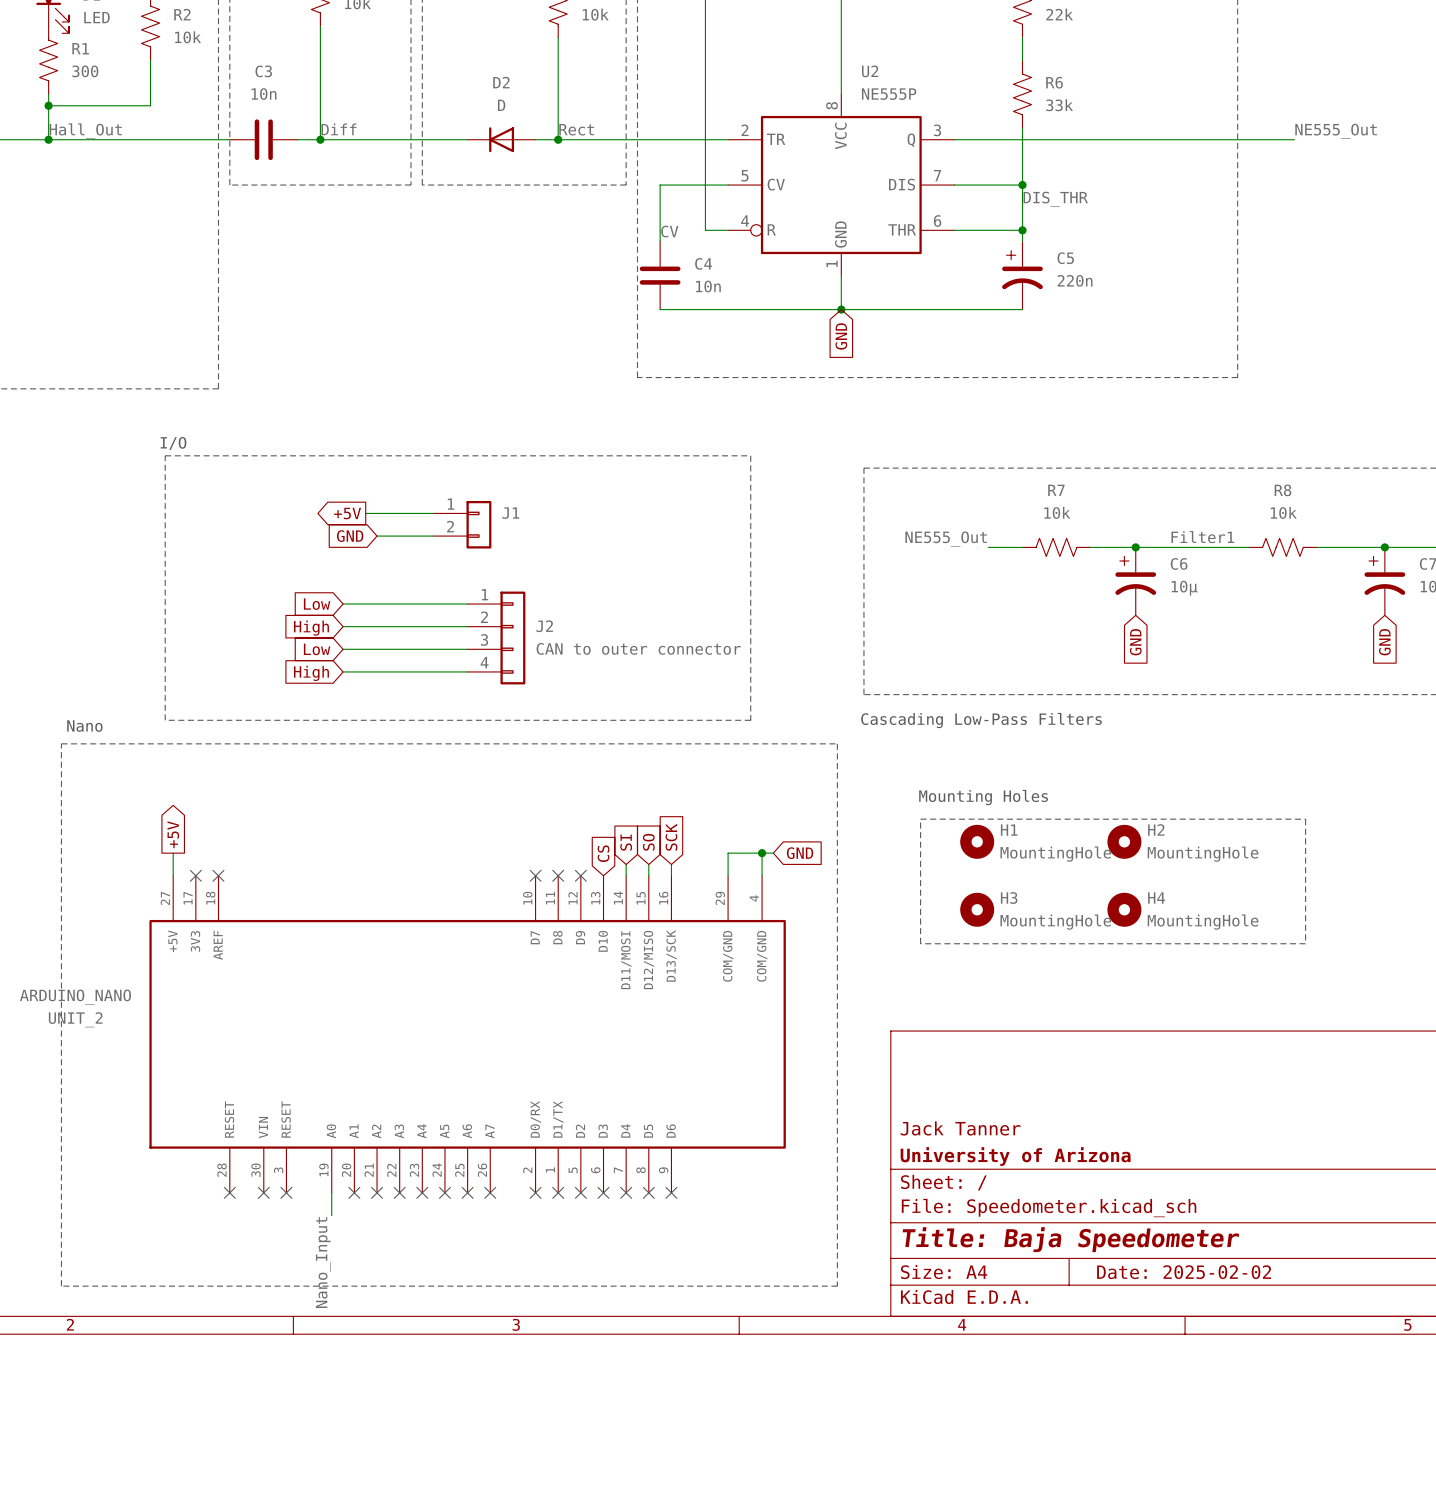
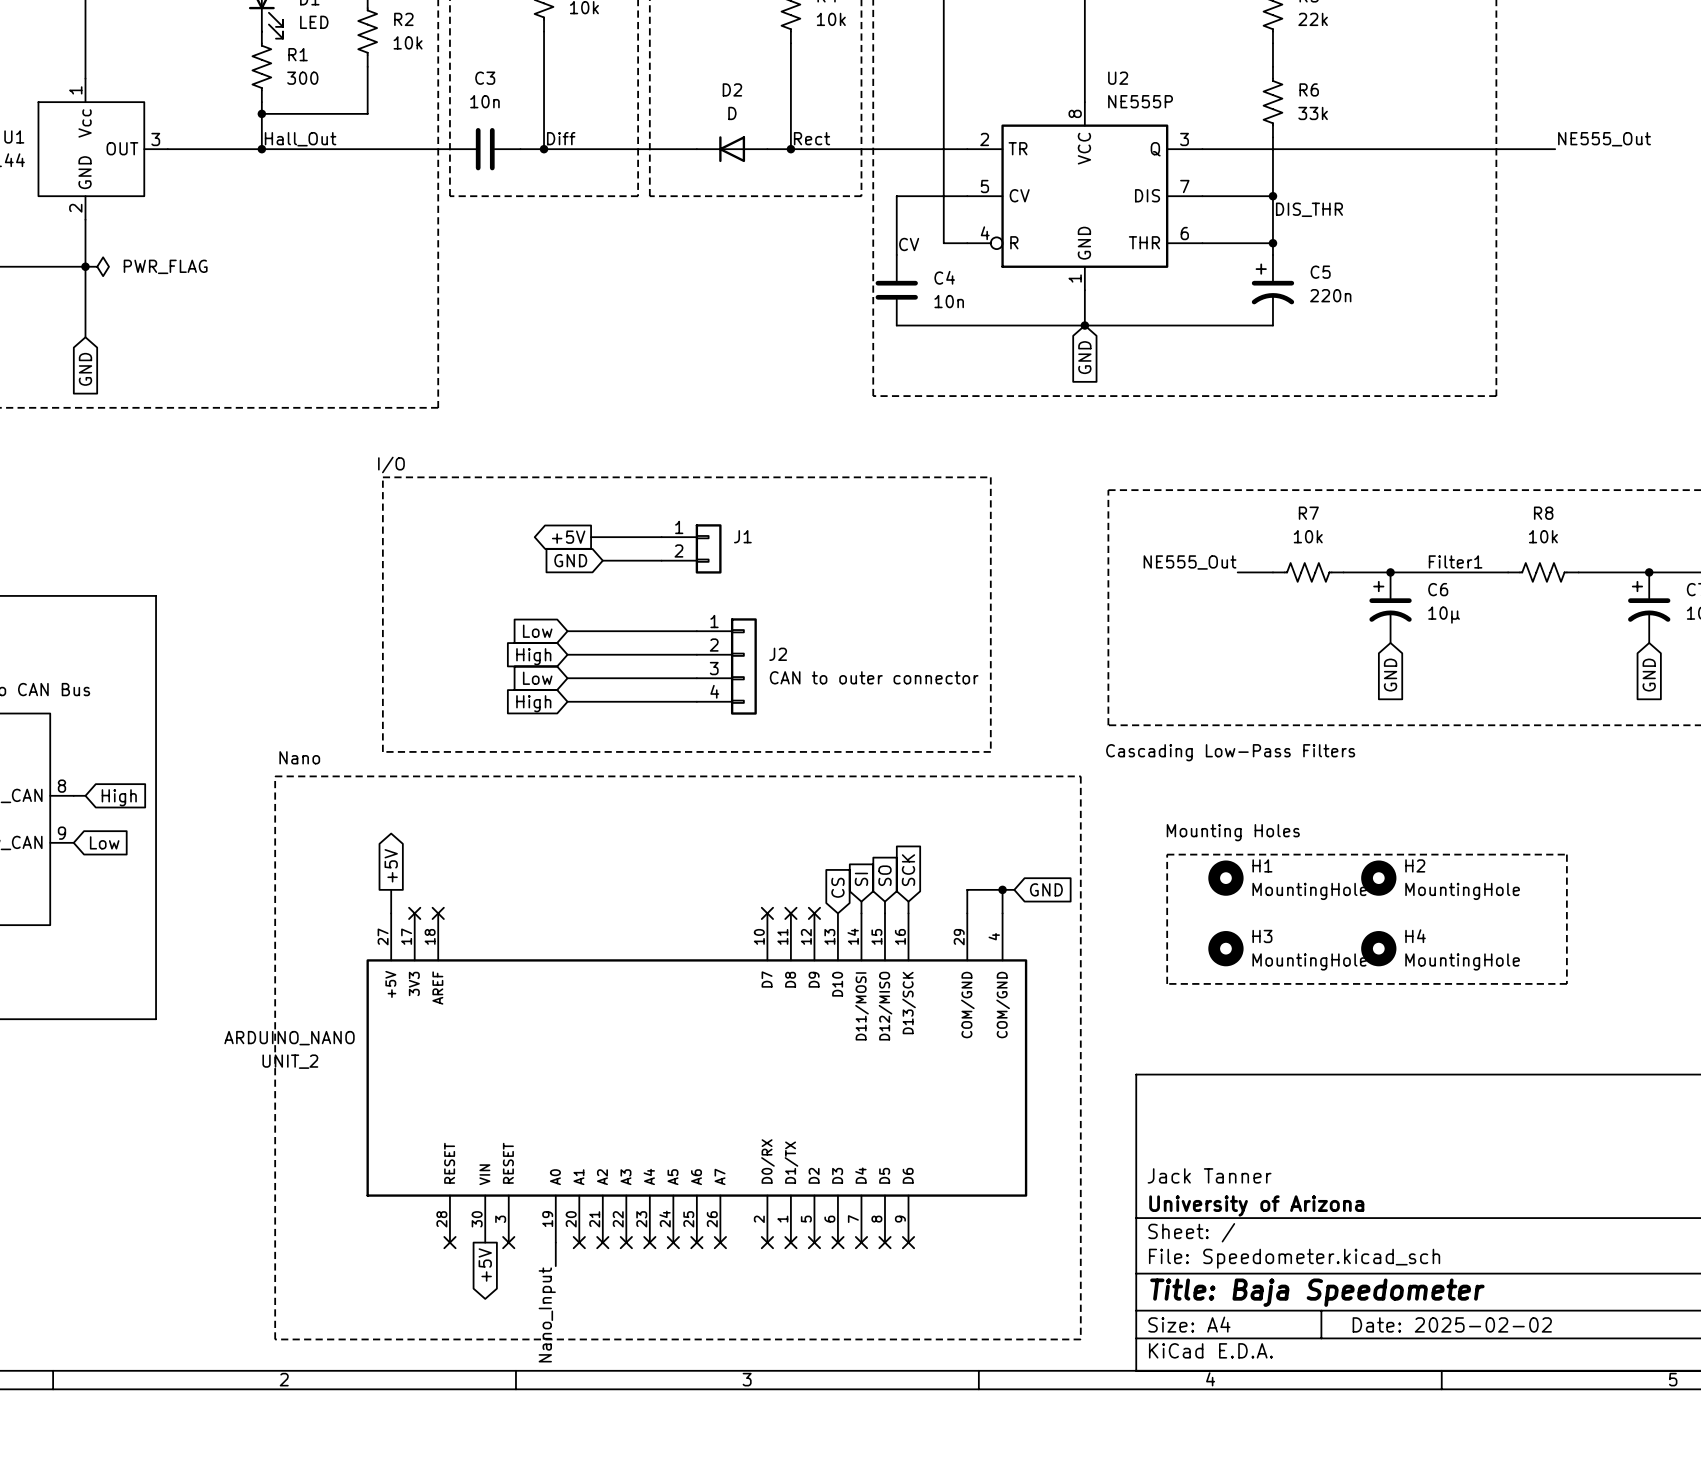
no-connect mark: (263, 1192) -> none
global label: none -> +5V (485, 1265)

